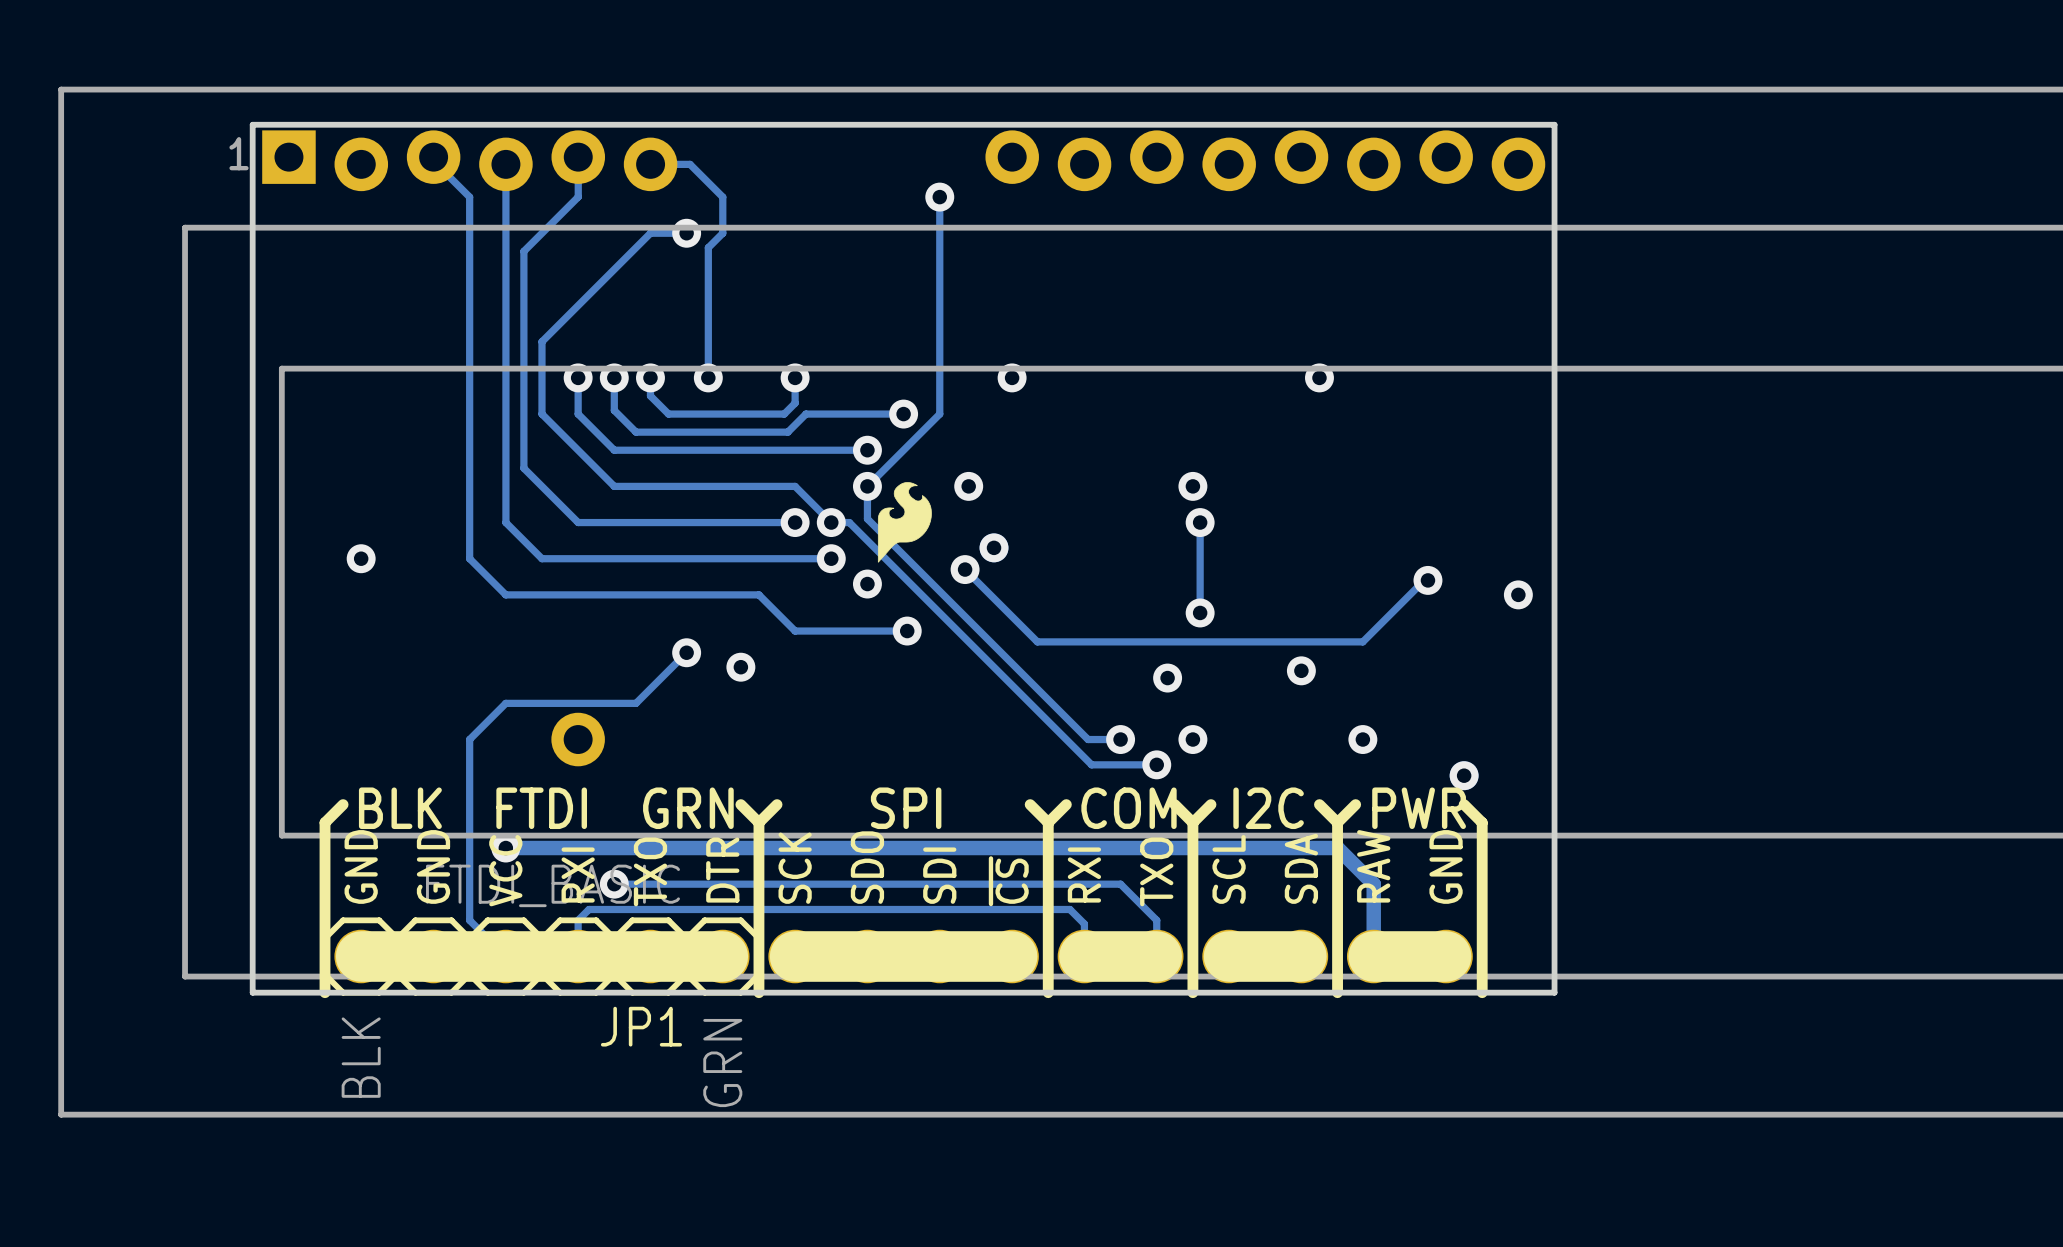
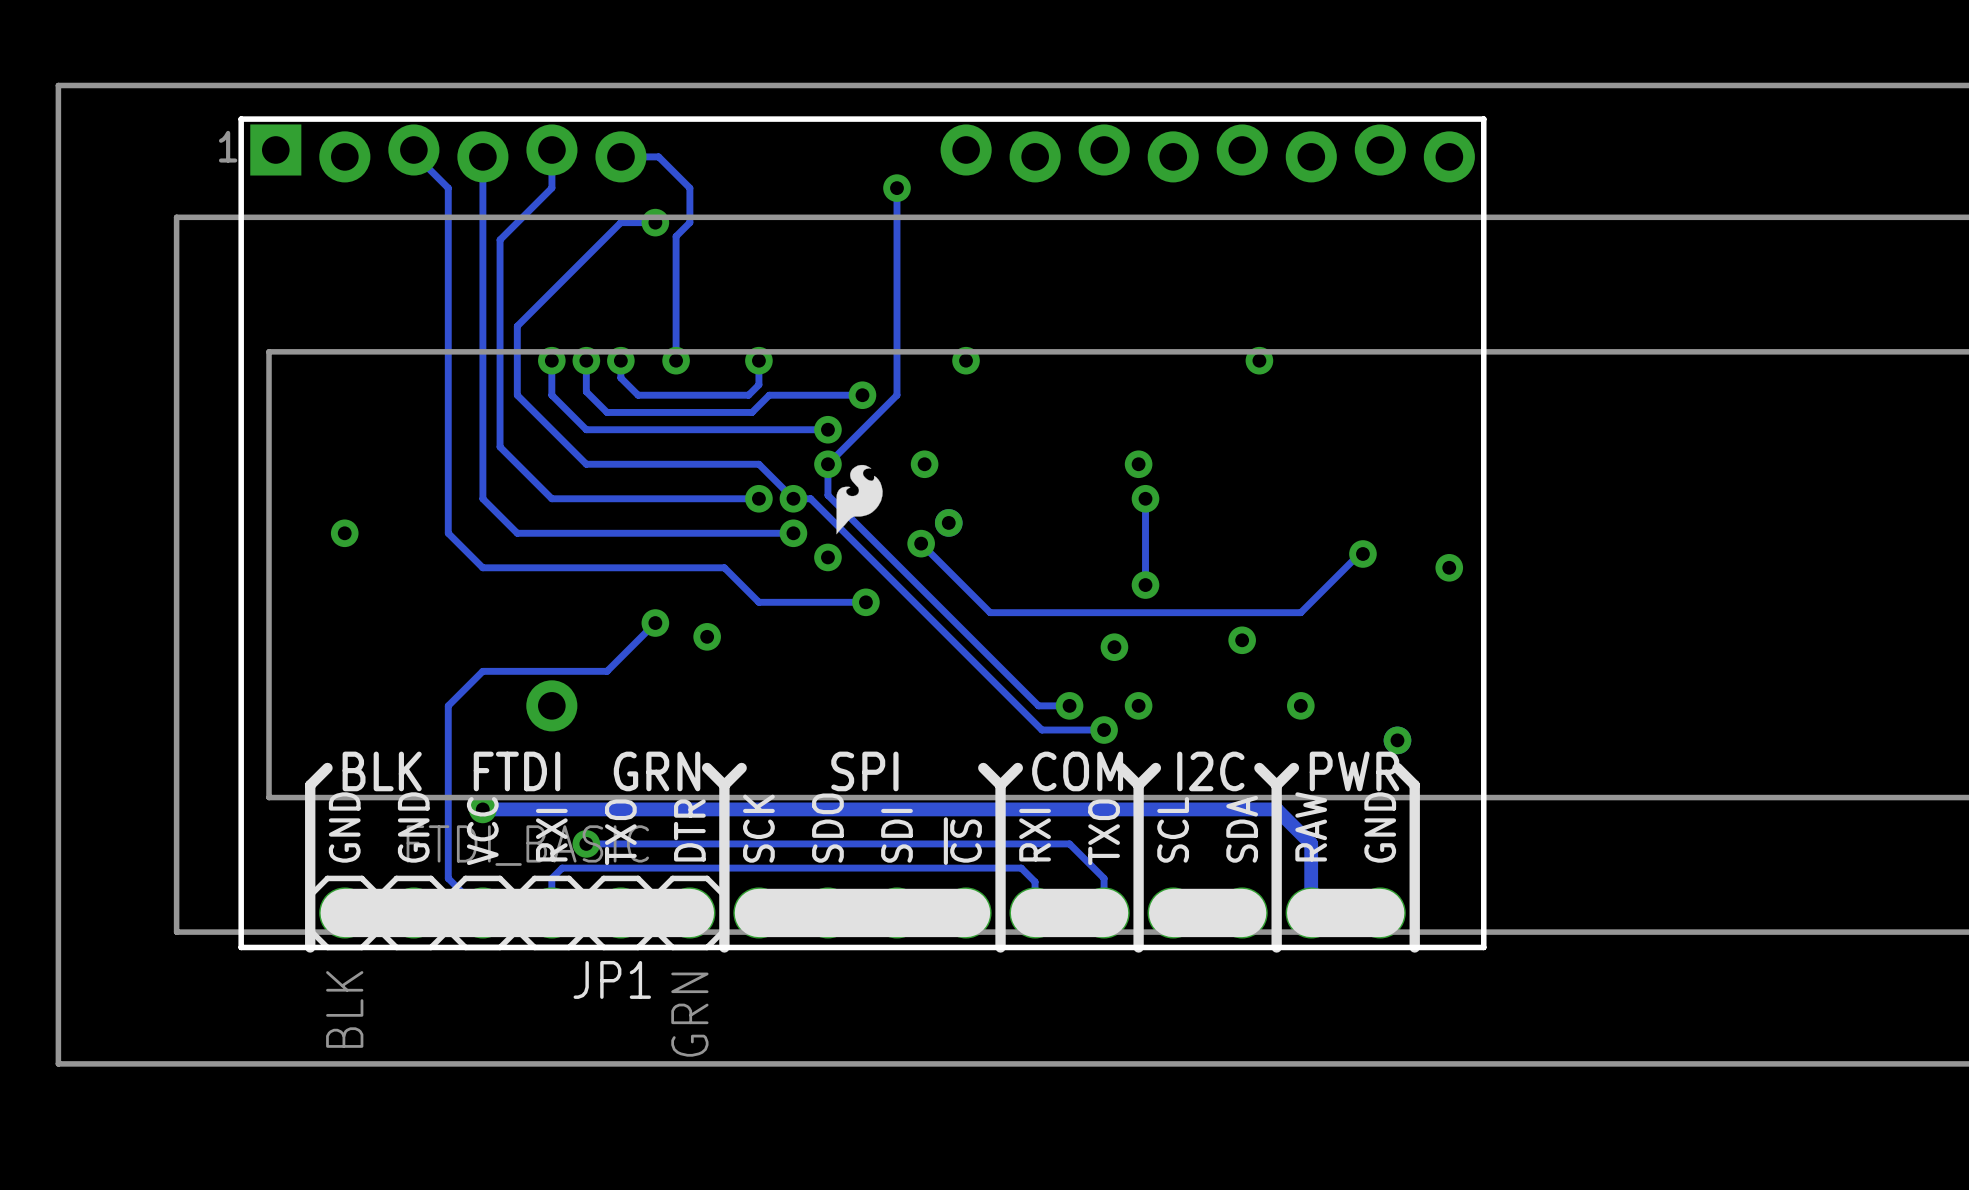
drawing shape: [877, 482, 932, 563] -> [836, 464, 883, 535]

